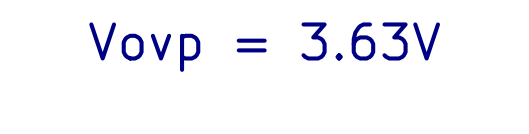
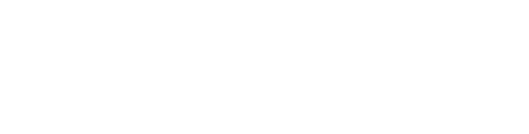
text: Vovp = 3.63V (264, 47) -> none

